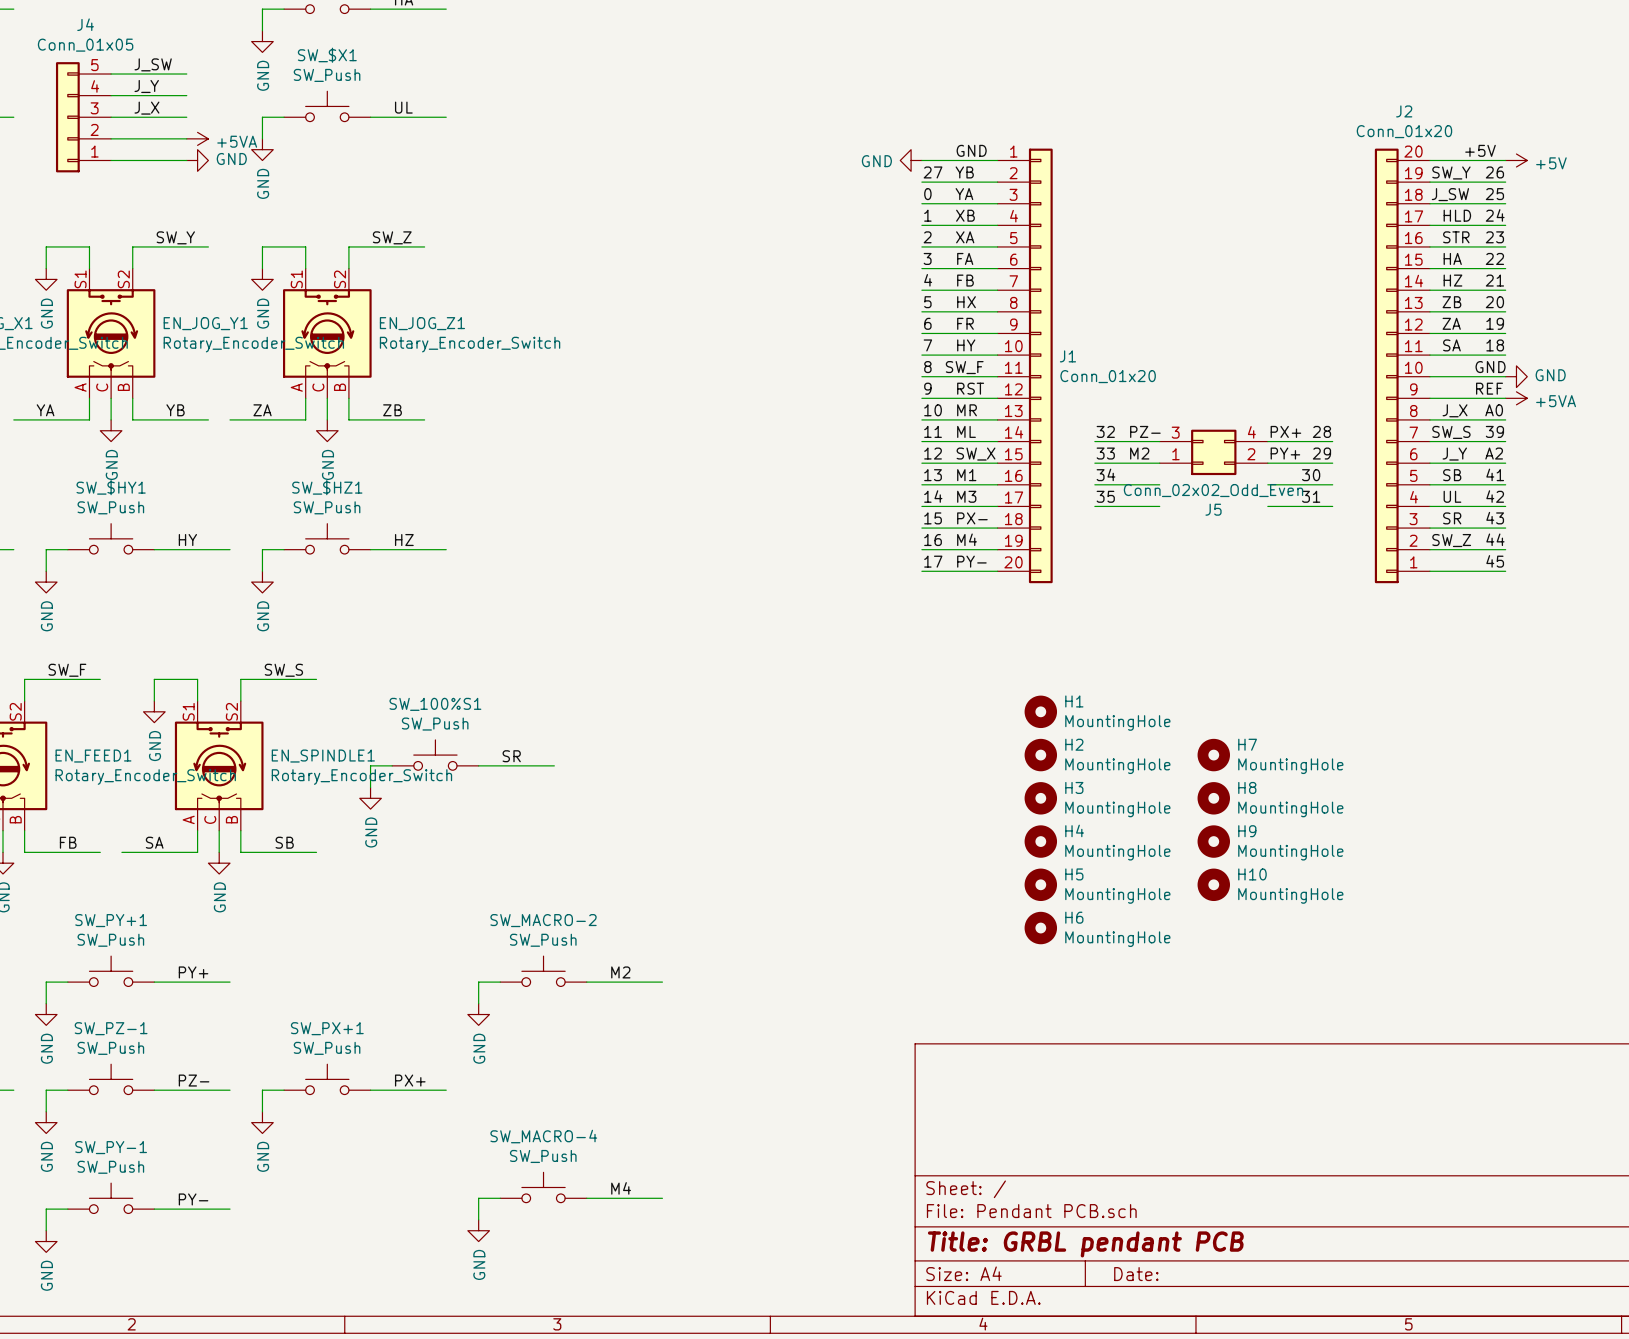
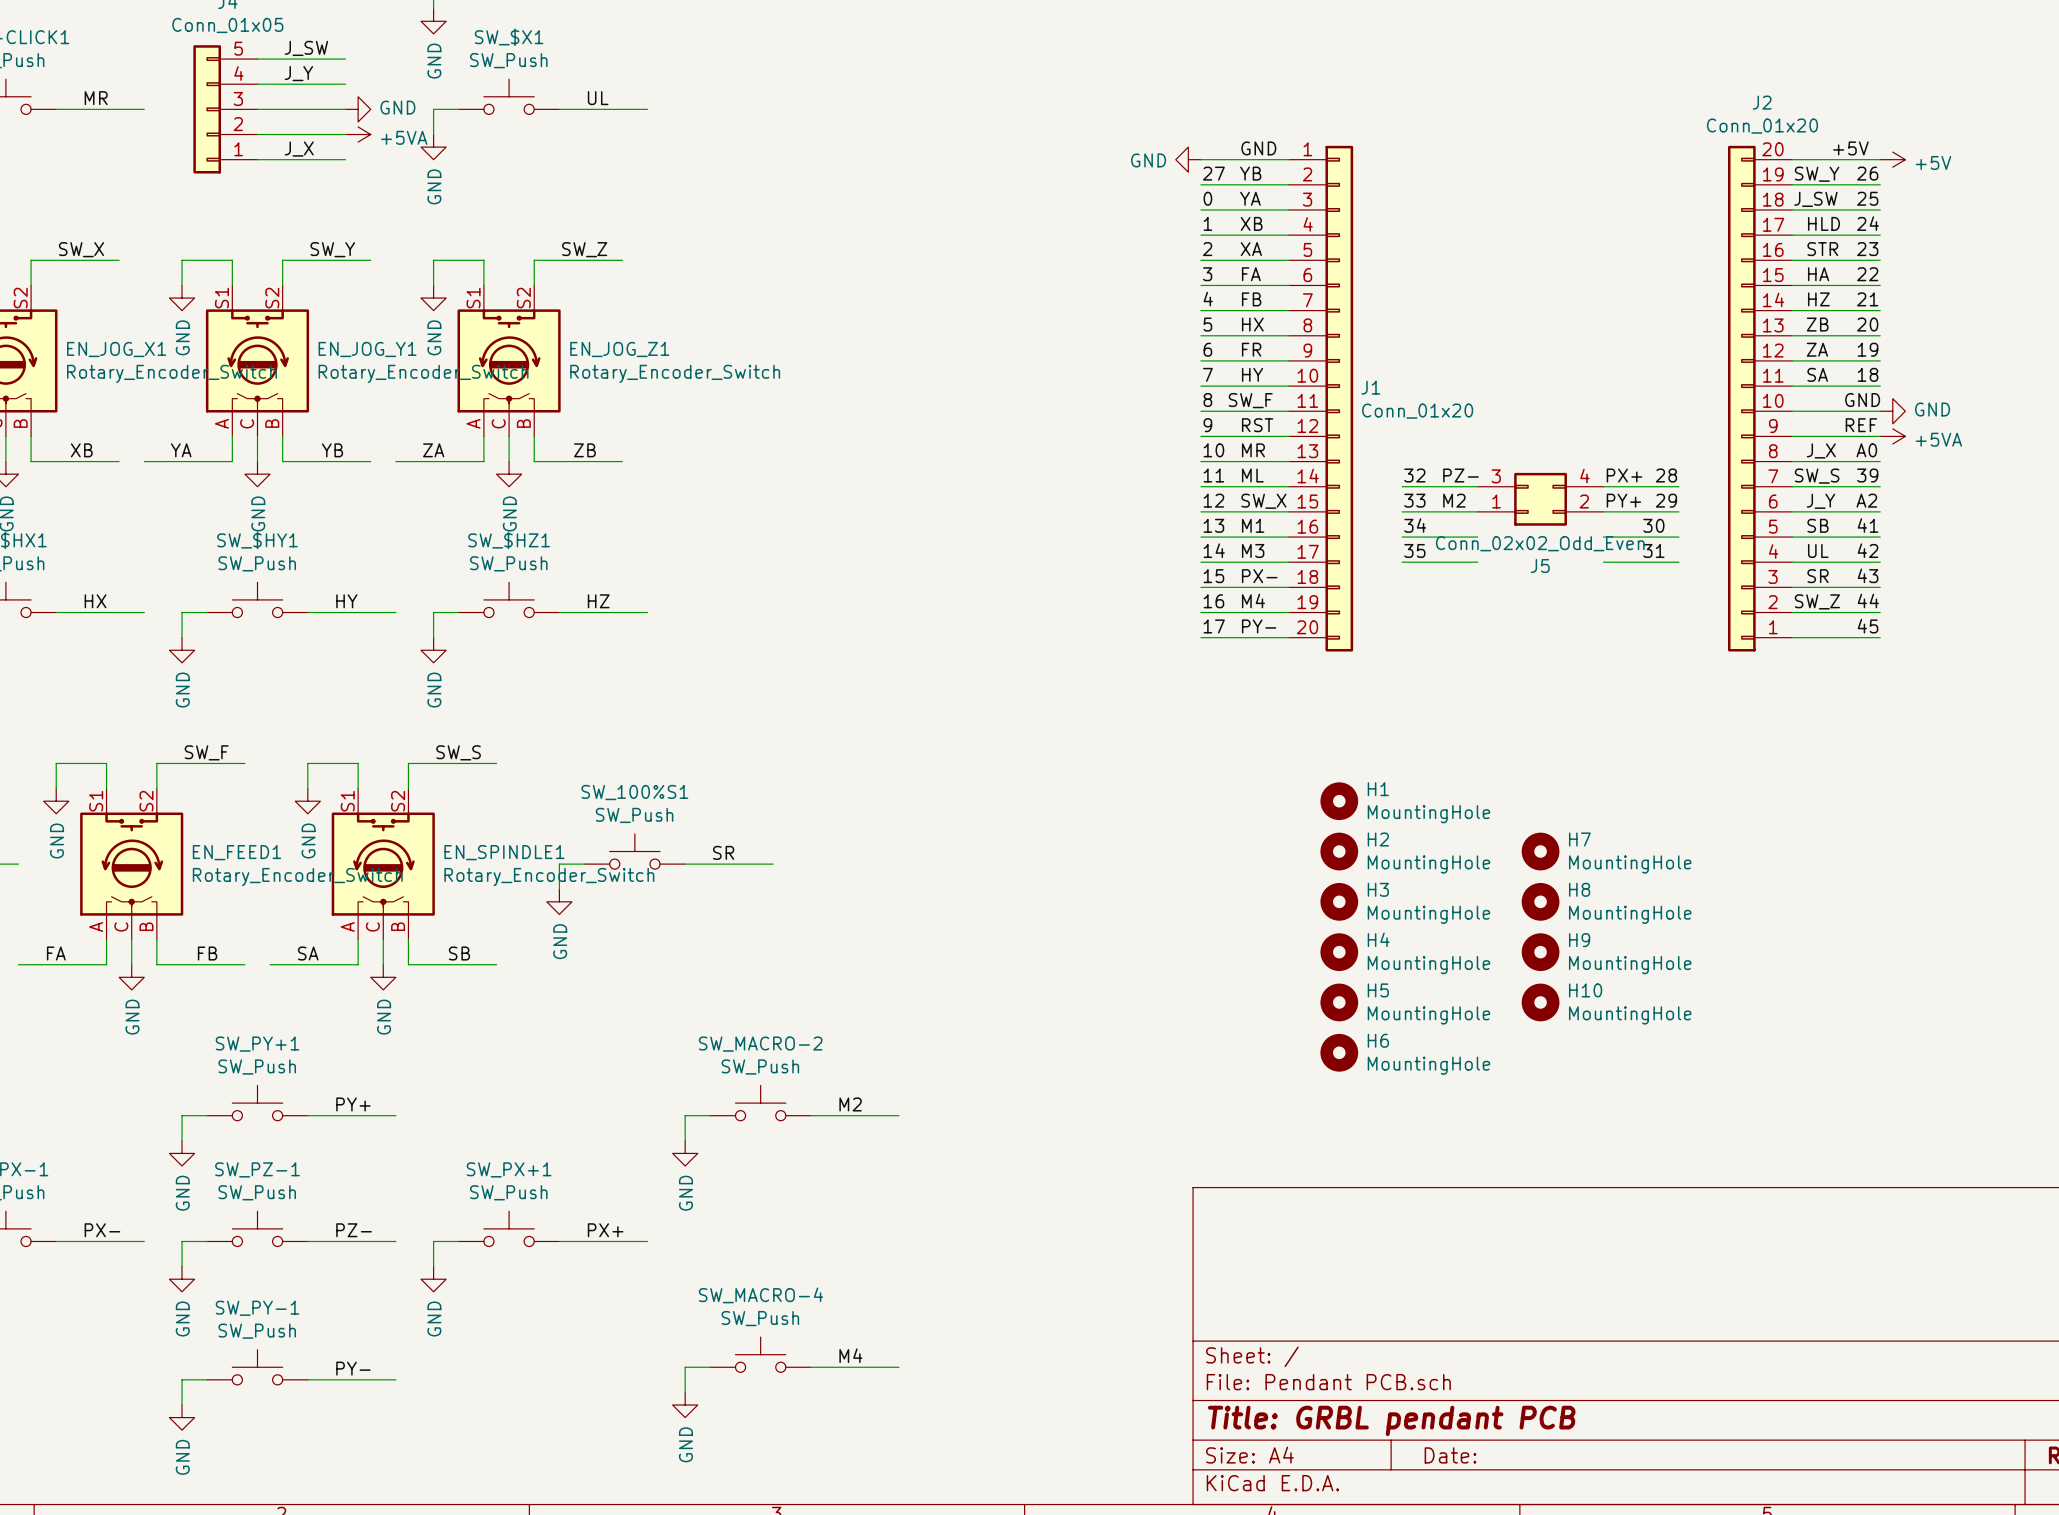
label position: J_X (146, 108) -> J_X (299, 149)
power symbol position: GND (197, 160) -> GND (358, 109)

